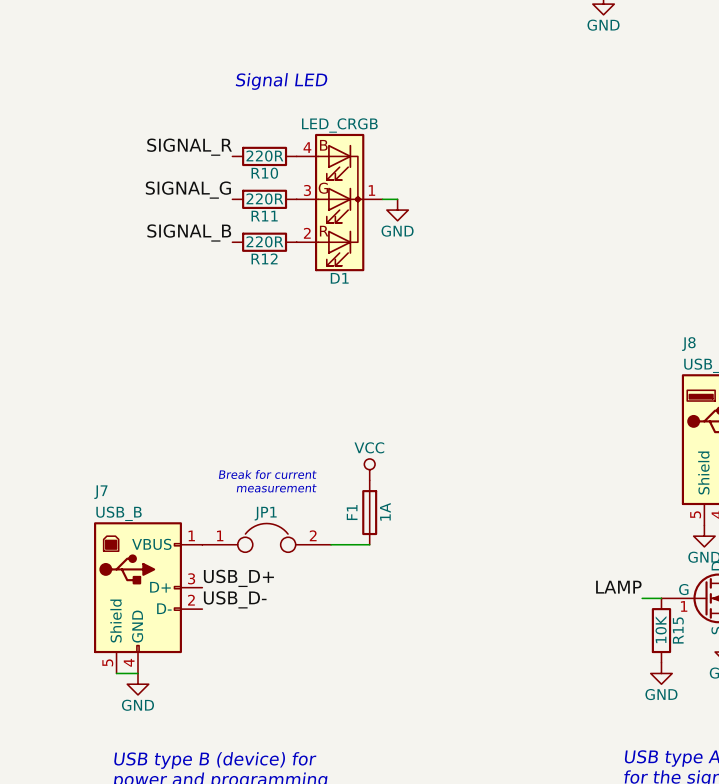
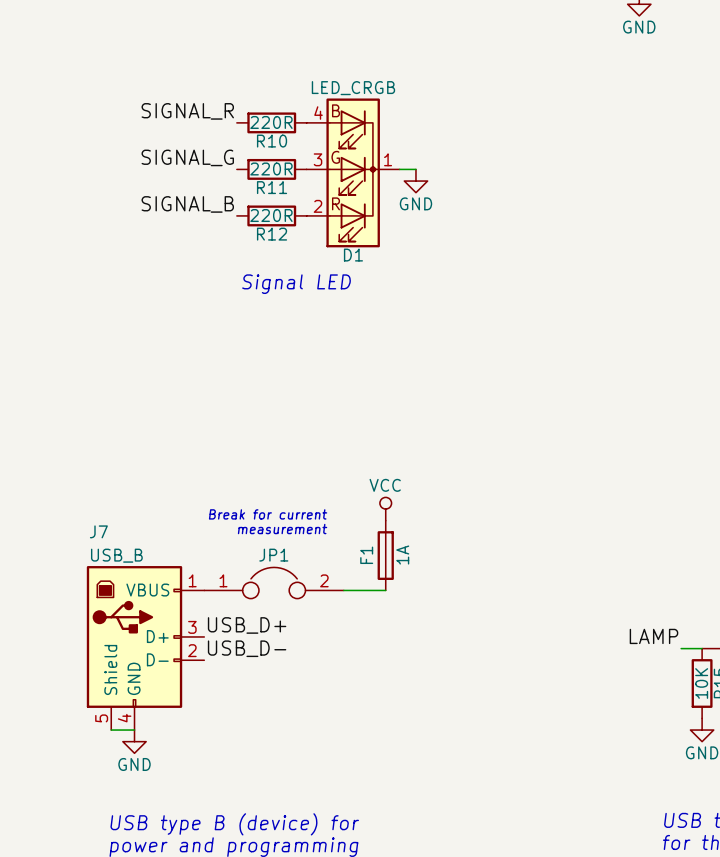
text position: Signal LED (281, 81) -> Signal LED (296, 284)
label: none -> SIGNAL_R (187, 111)
R10: none -> 220R (271, 122)
label: SIGNAL_R (189, 147) -> SIGNAL_G (187, 157)
R10 name: R10 (264, 173) -> R11 (272, 187)
label: SIGNAL_G (188, 190) -> SIGNAL_B (187, 204)
wire: (382, 199) (397, 199) -> (399, 169) (415, 169)
D1 position: (339, 202) -> (353, 172)
power symbol position: GND (397, 210) -> GND (415, 181)
R11 name: R11 (264, 216) -> R12 (272, 234)
label: SIGNAL_B (189, 232) -> none
R12: 220R (264, 242) -> none

